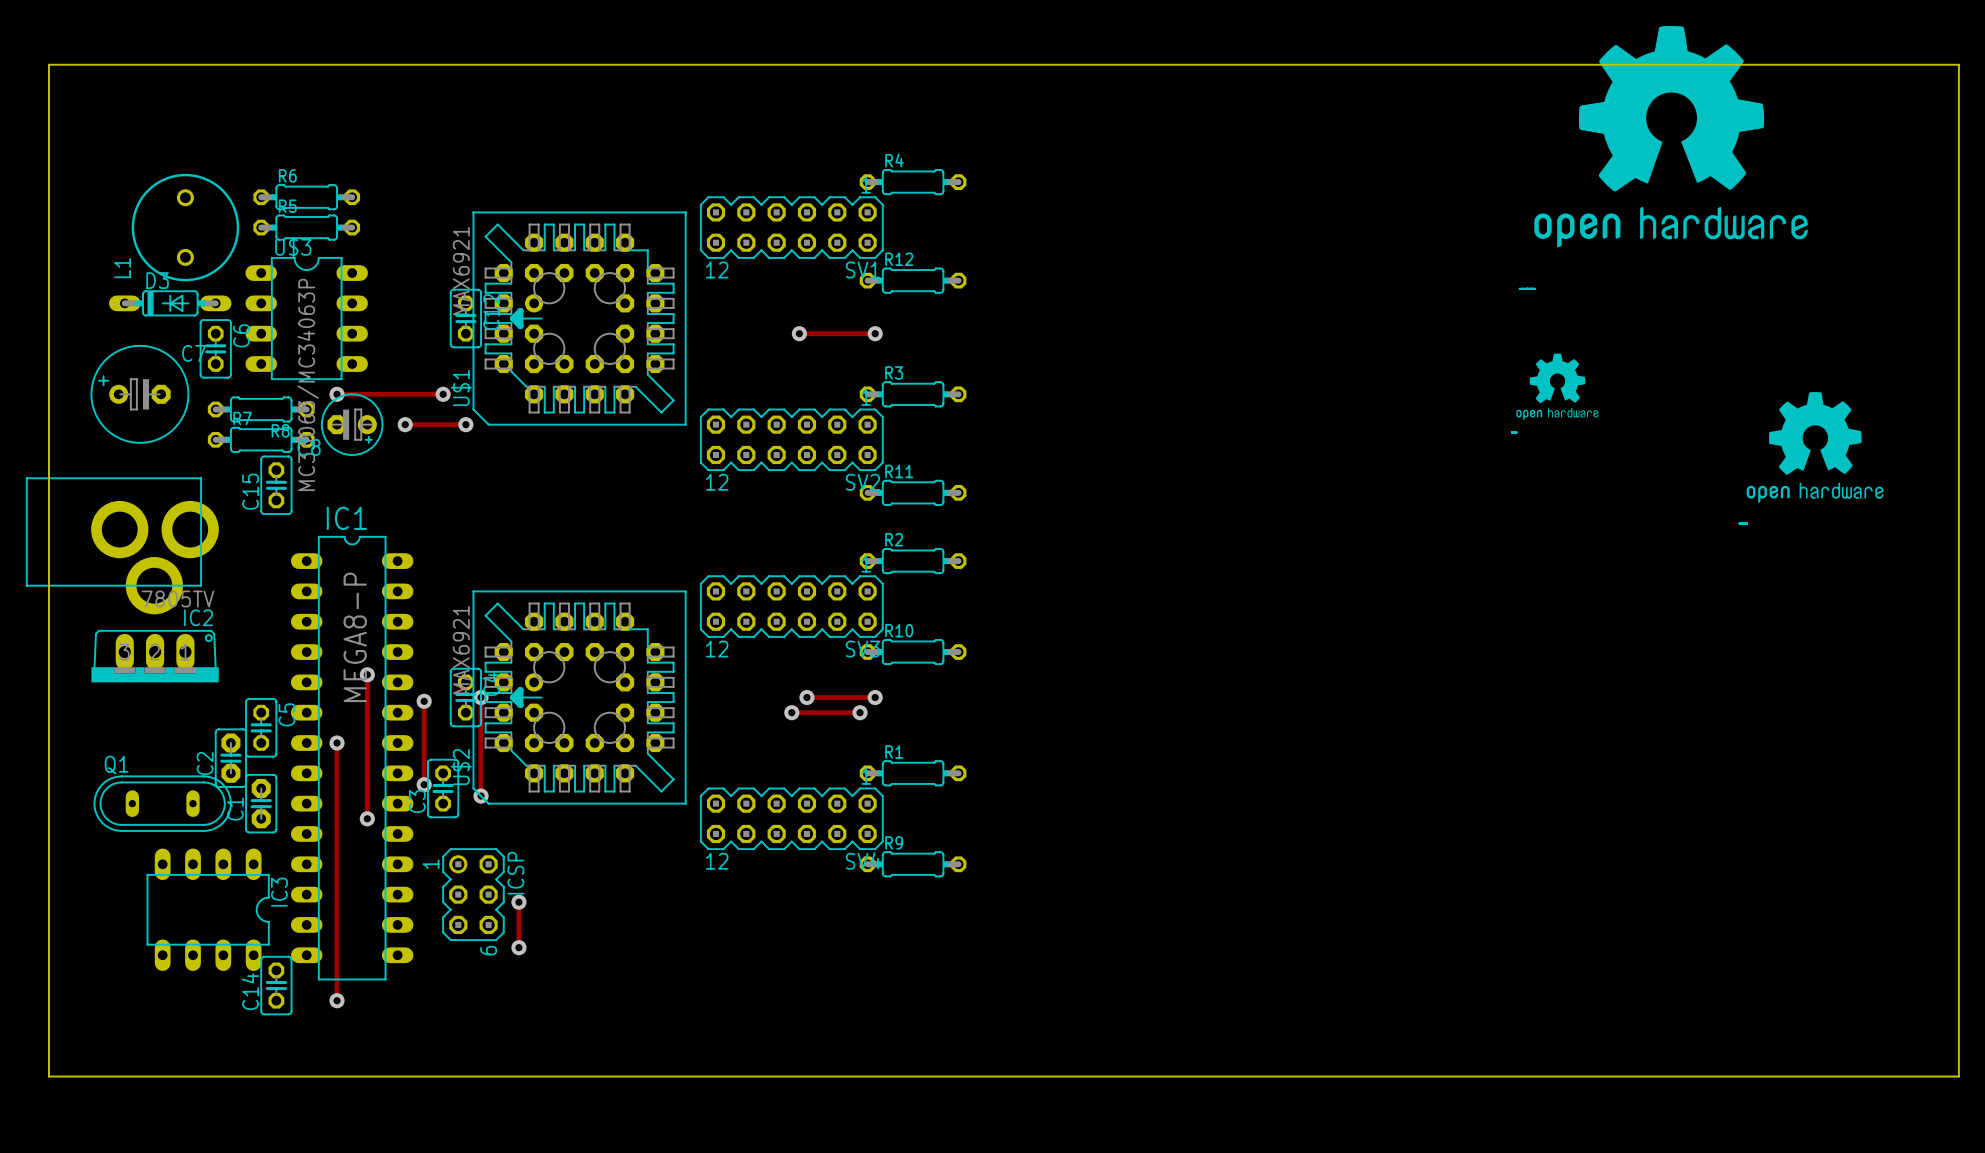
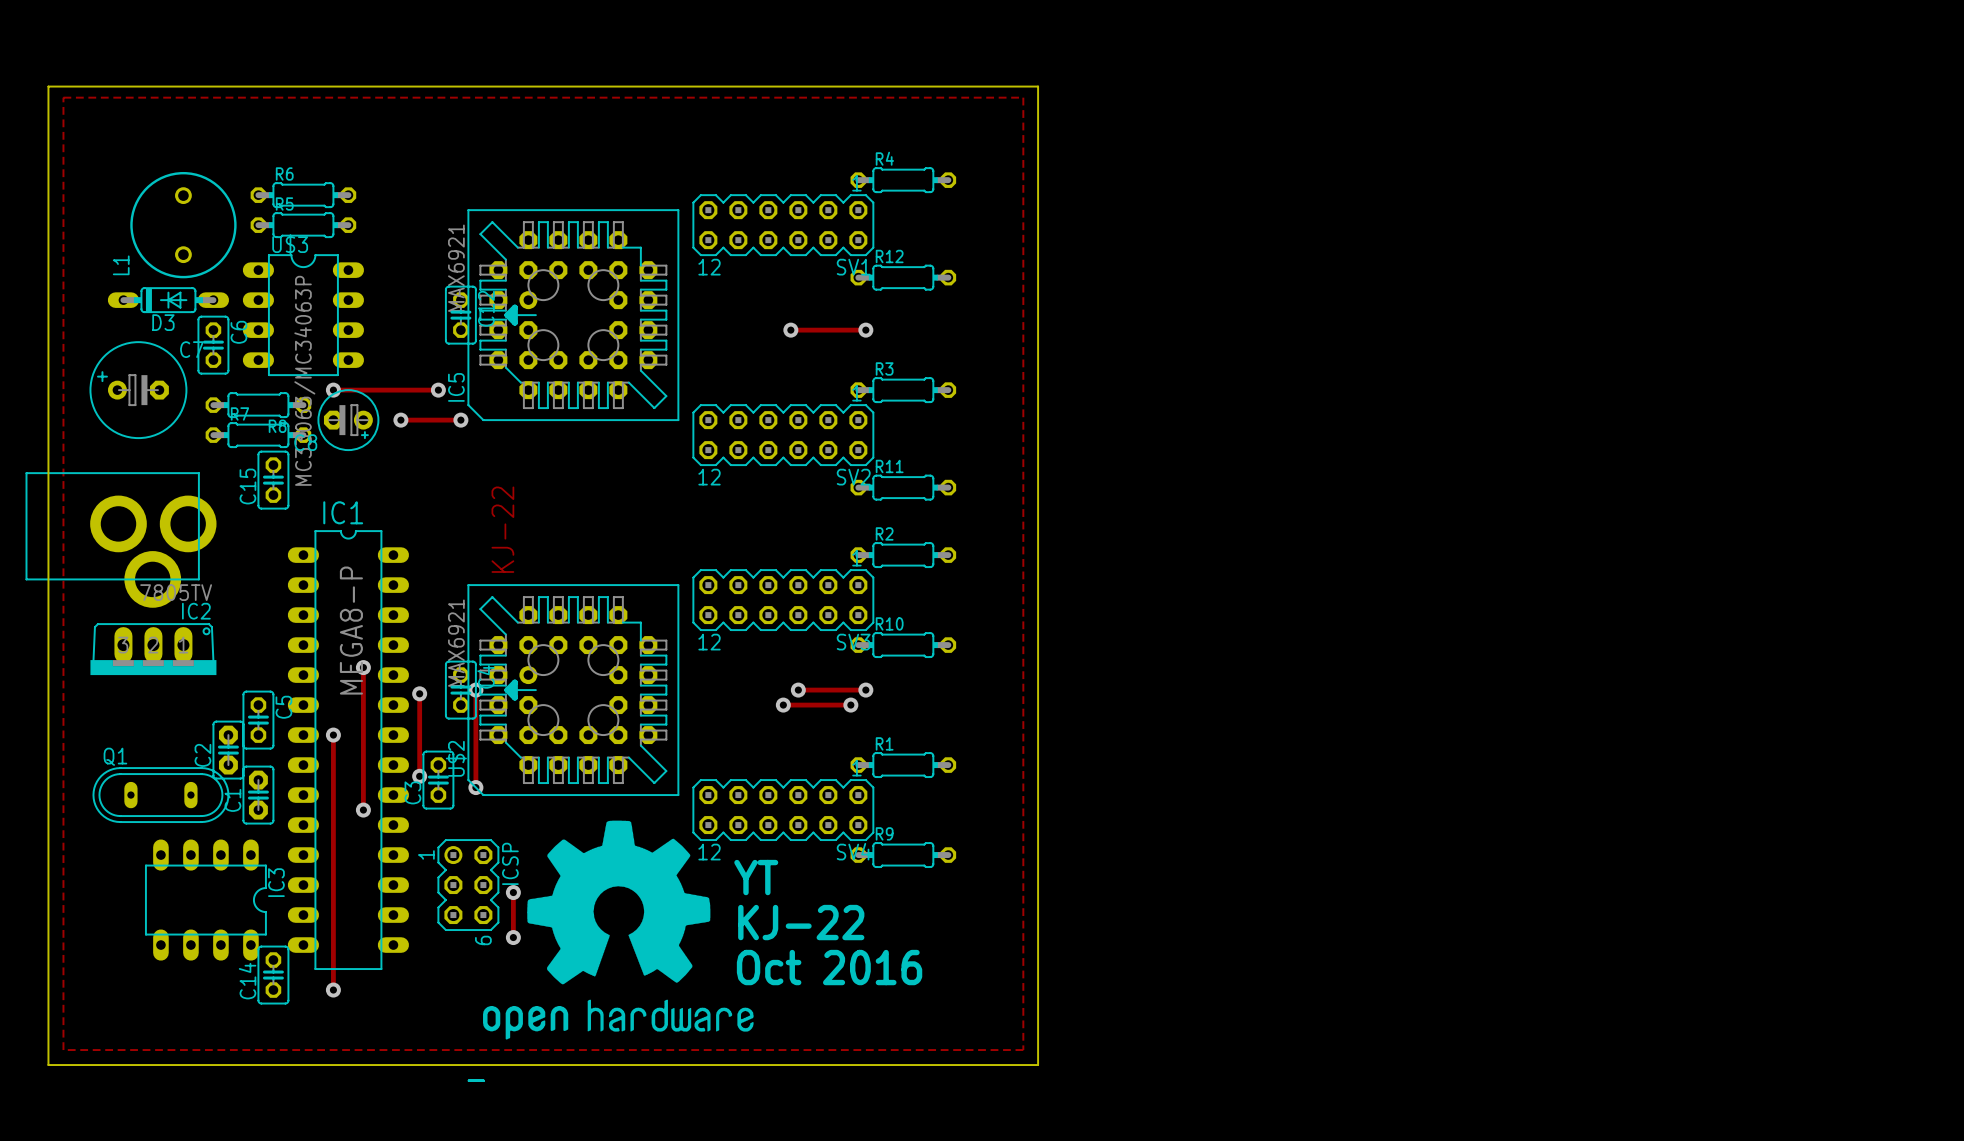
drawing: [1534, 26, 1808, 248] -> none
board edge: (48, 87) (48, 64) (1958, 64) (1958, 1076) (1049, 1076) -> (48, 86) (1038, 86) (1038, 1065)
zone outline: none -> (63, 97) (1023, 97) (1023, 1050) (63, 1050) (63, 97)
D3 name position: D3 (157, 280) -> D3 (163, 322)
drawing: [1516, 353, 1599, 420] -> none
U$1 name: U$1 (461, 388) -> IC5 (456, 387)
drawing: [1746, 392, 1884, 503] -> none
text: none -> KJ-22 (502, 529)
drawing: none -> [483, 820, 754, 1040]
text: none -> YT (756, 877)
text: none -> KJ-22 (801, 922)
text: none -> Oct 2016 (829, 967)

